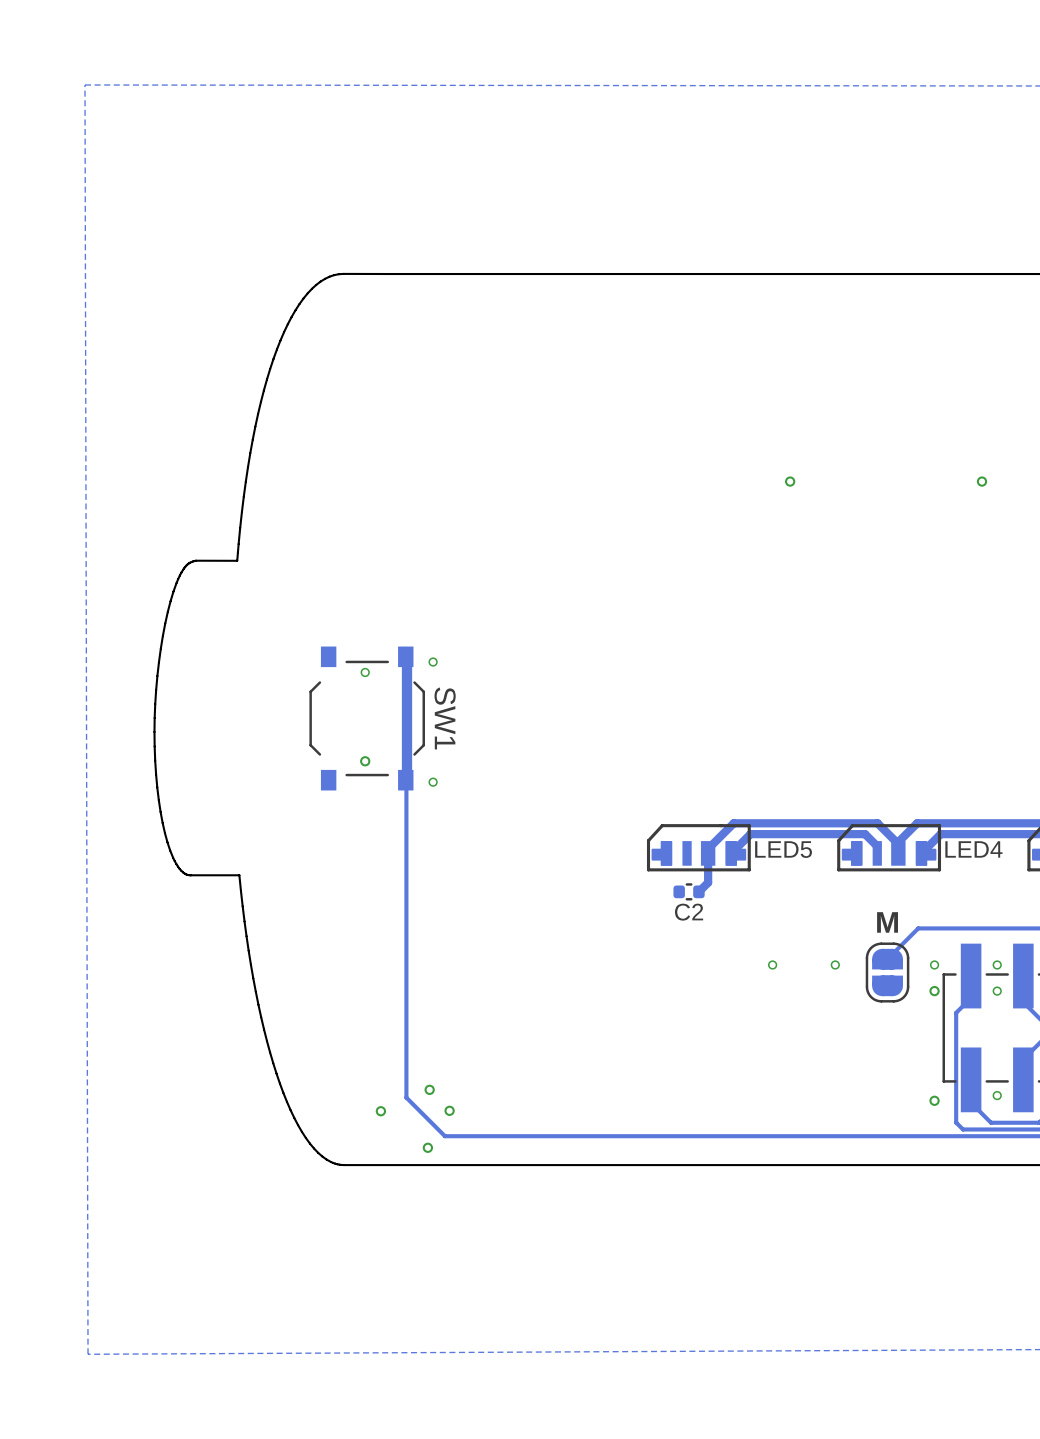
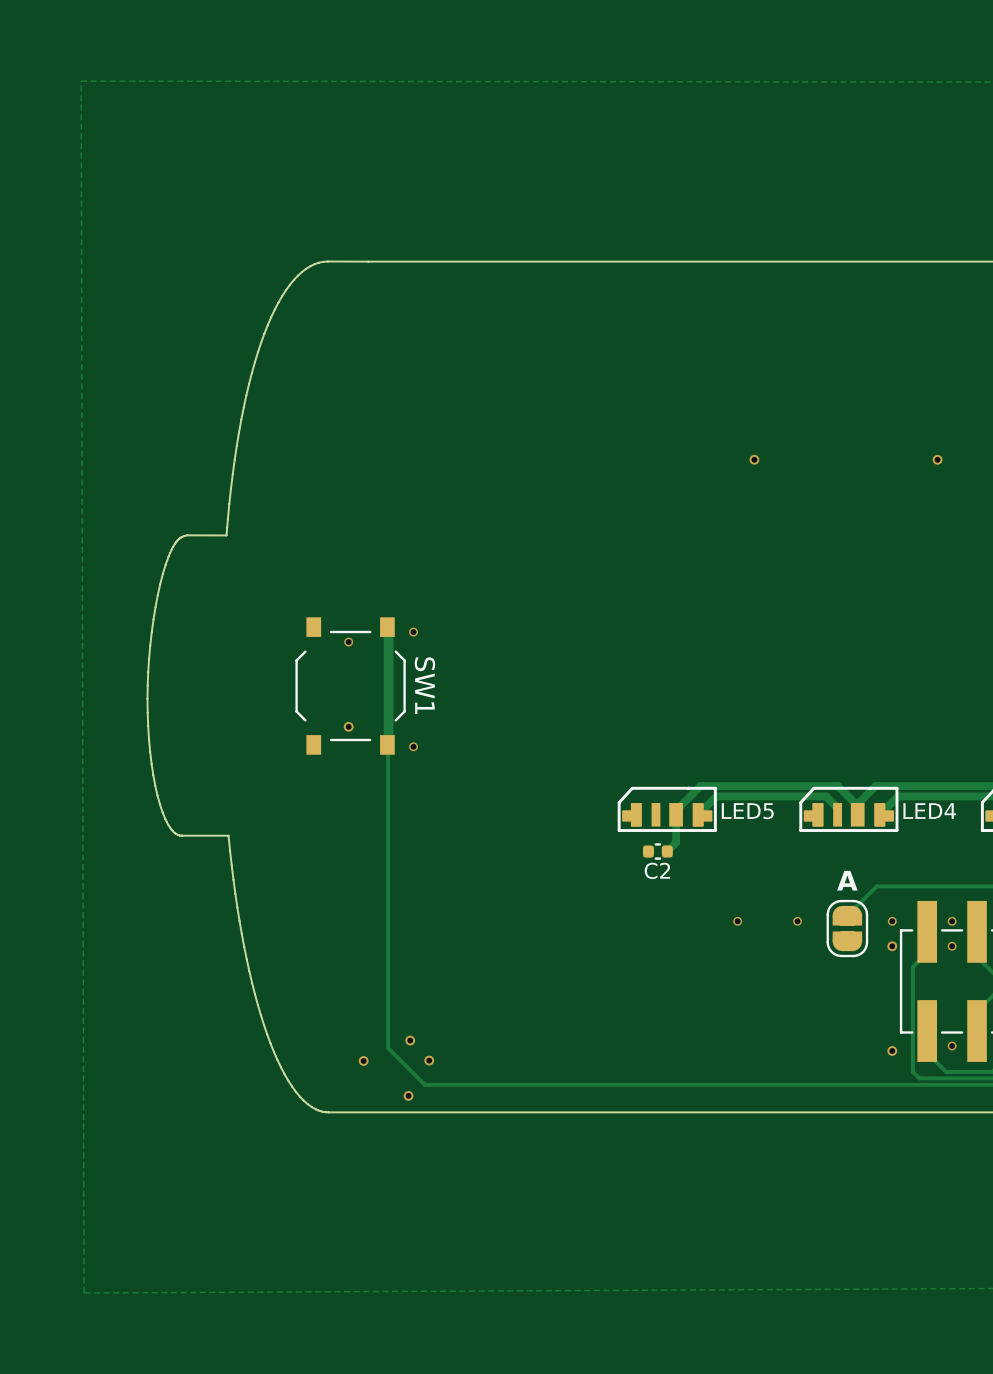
text: M (887, 922) -> A (847, 880)

